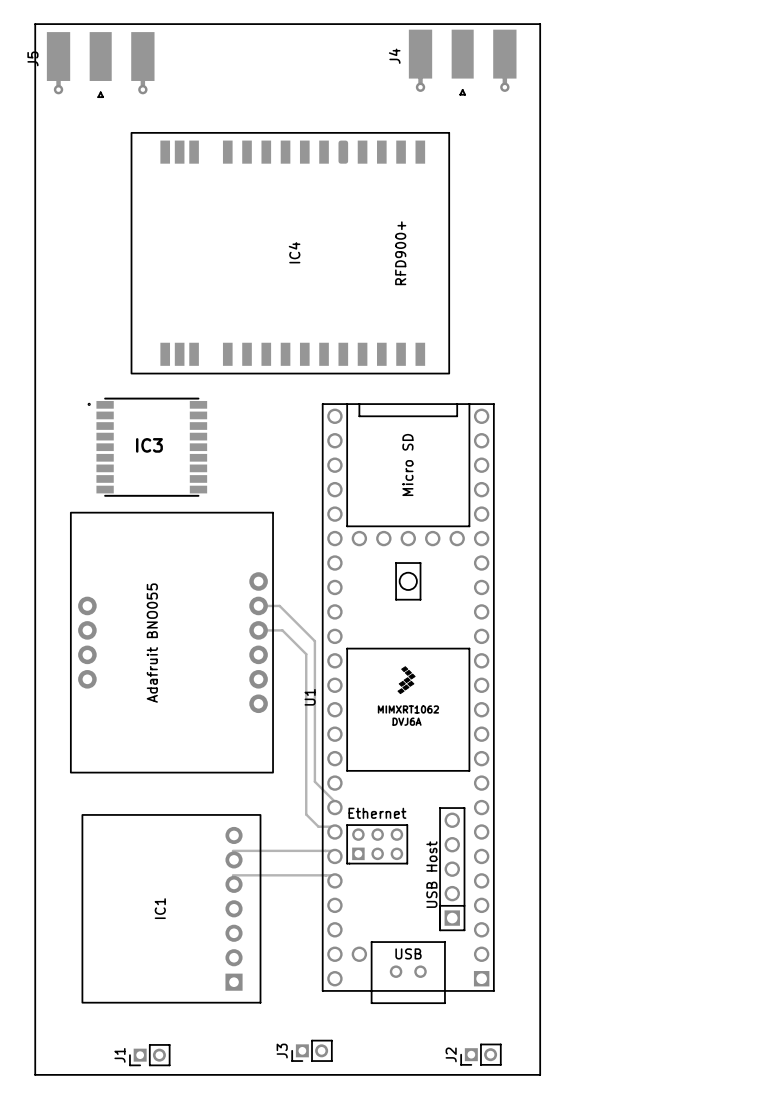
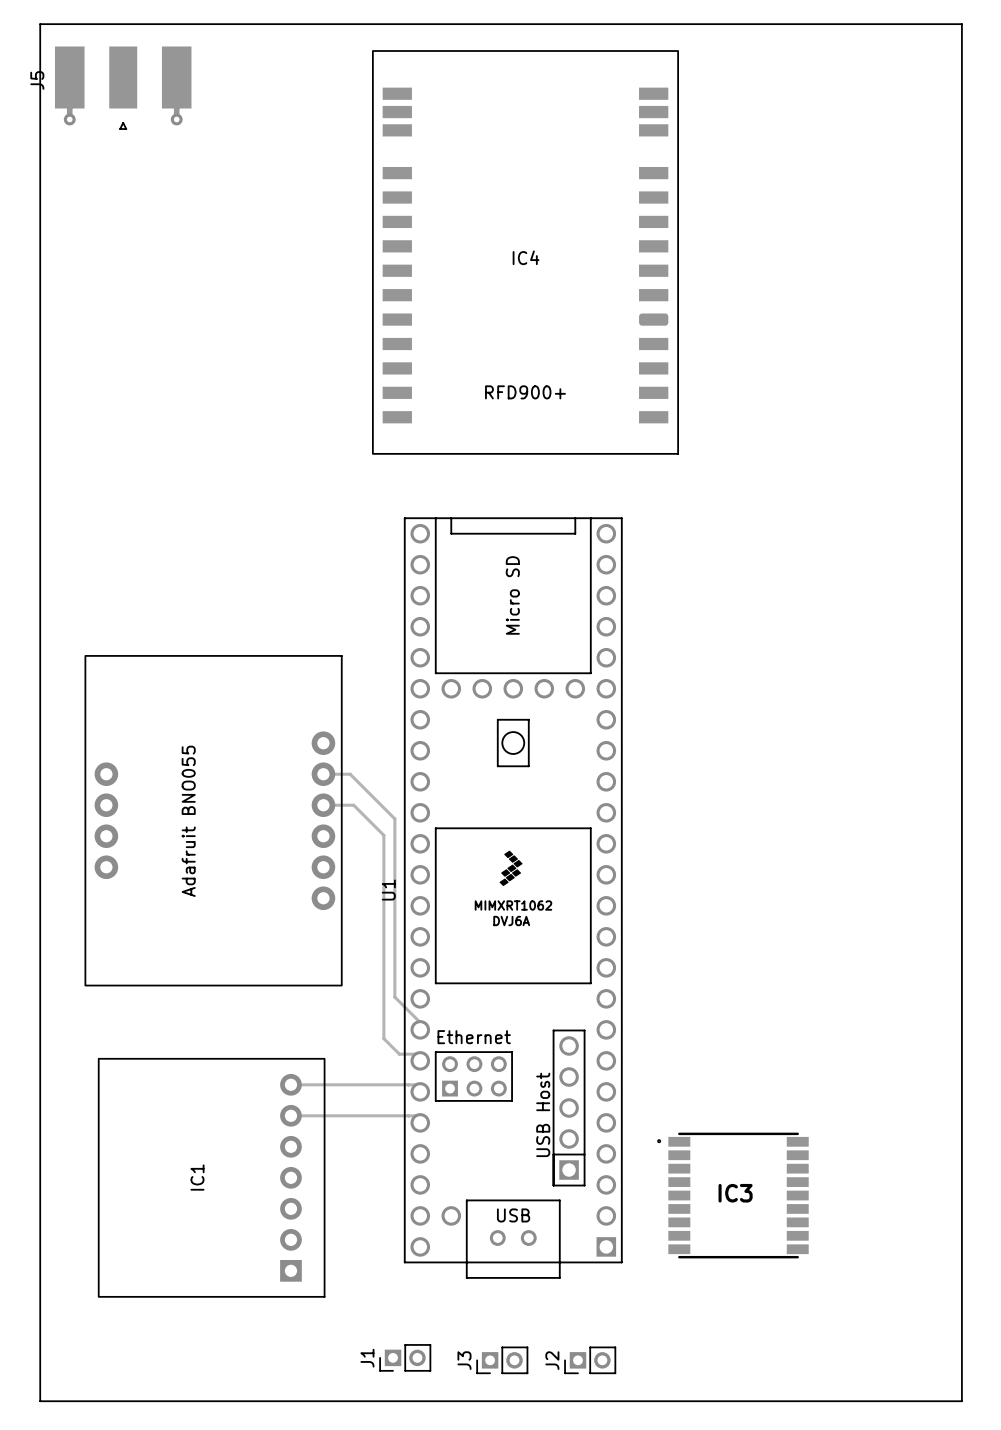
board edge: (35, 24) (540, 24) (540, 1074) (35, 1074) -> (40, 36) (40, 24) (961, 24) (961, 1401) (40, 1401) (40, 1368)
J4: (462, 62) -> none
IC4 rotation: 0° (290, 253) -> 90° clockwise (525, 252)
IC3 position: (147, 447) -> (732, 1195)
IC1 position: (171, 908) -> (211, 1177)
J3 position: (312, 1050) -> (502, 1360)
J2 position: (480, 1054) -> (590, 1360)
J1 position: (149, 1055) -> (405, 1357)

